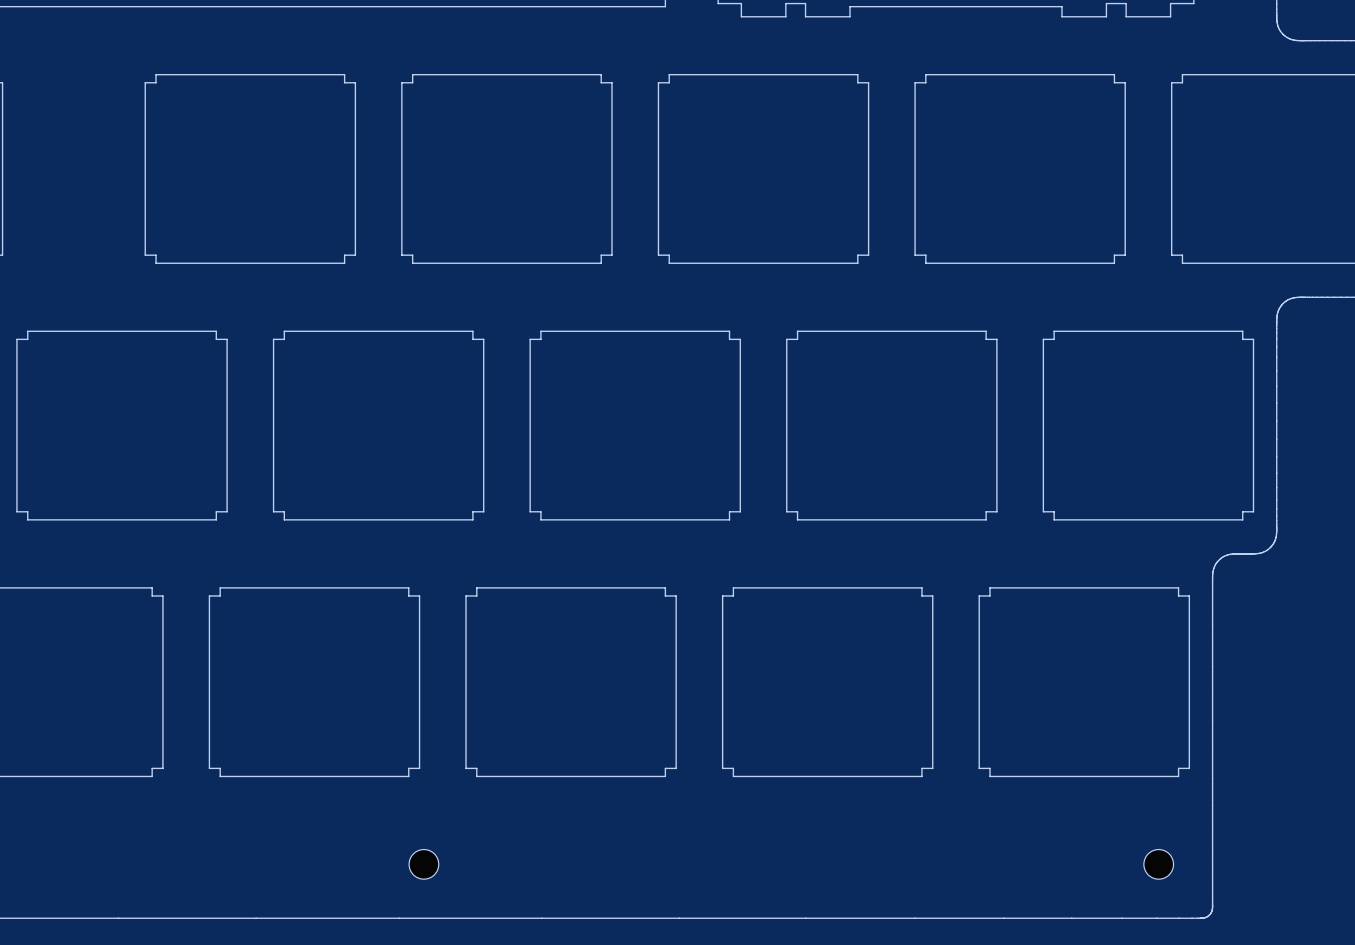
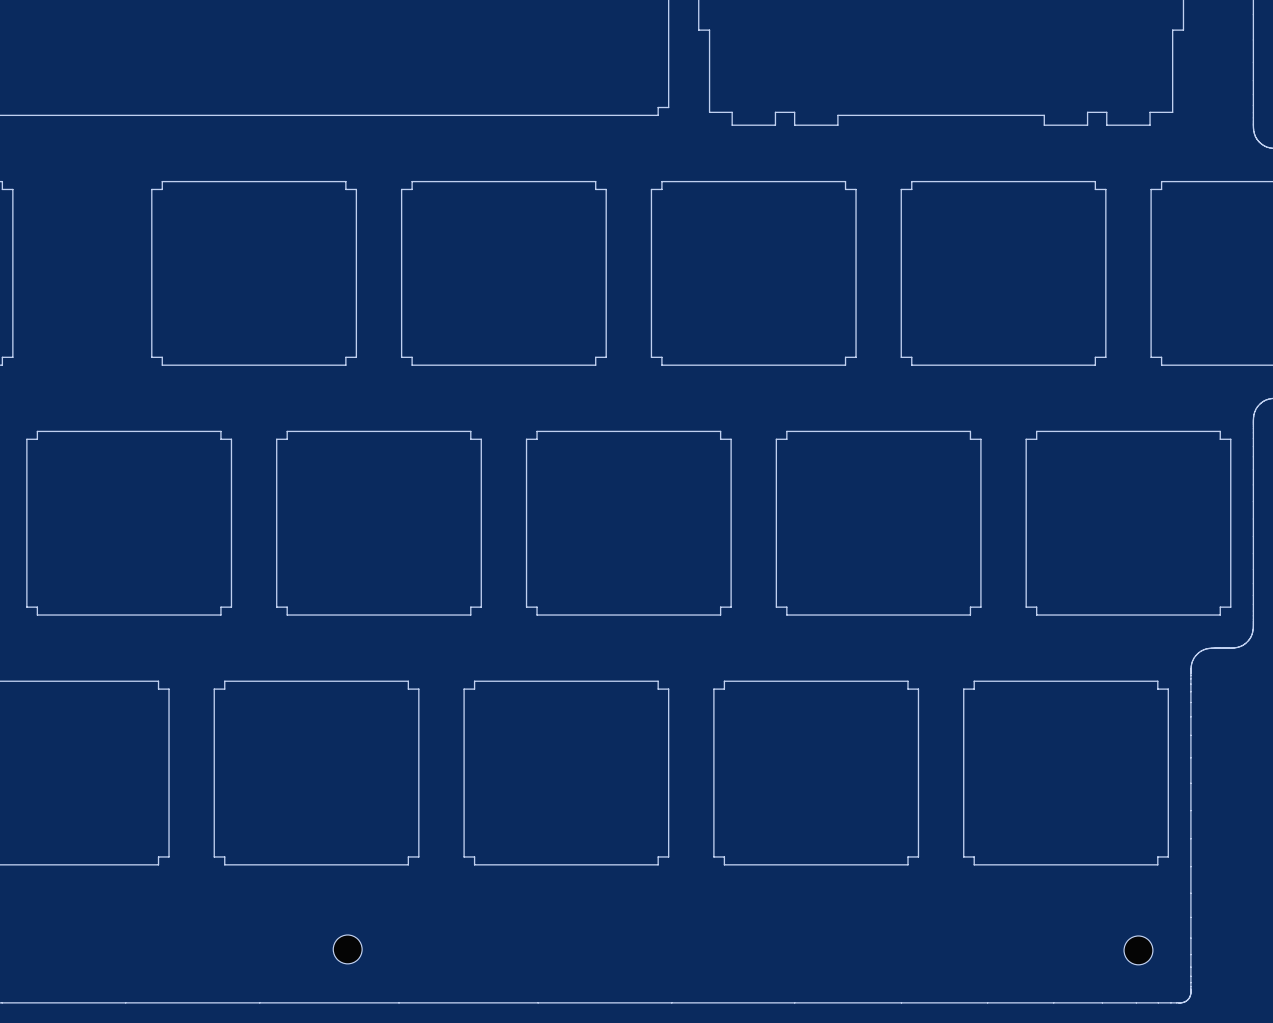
part position: (423, 864) -> (347, 949)

